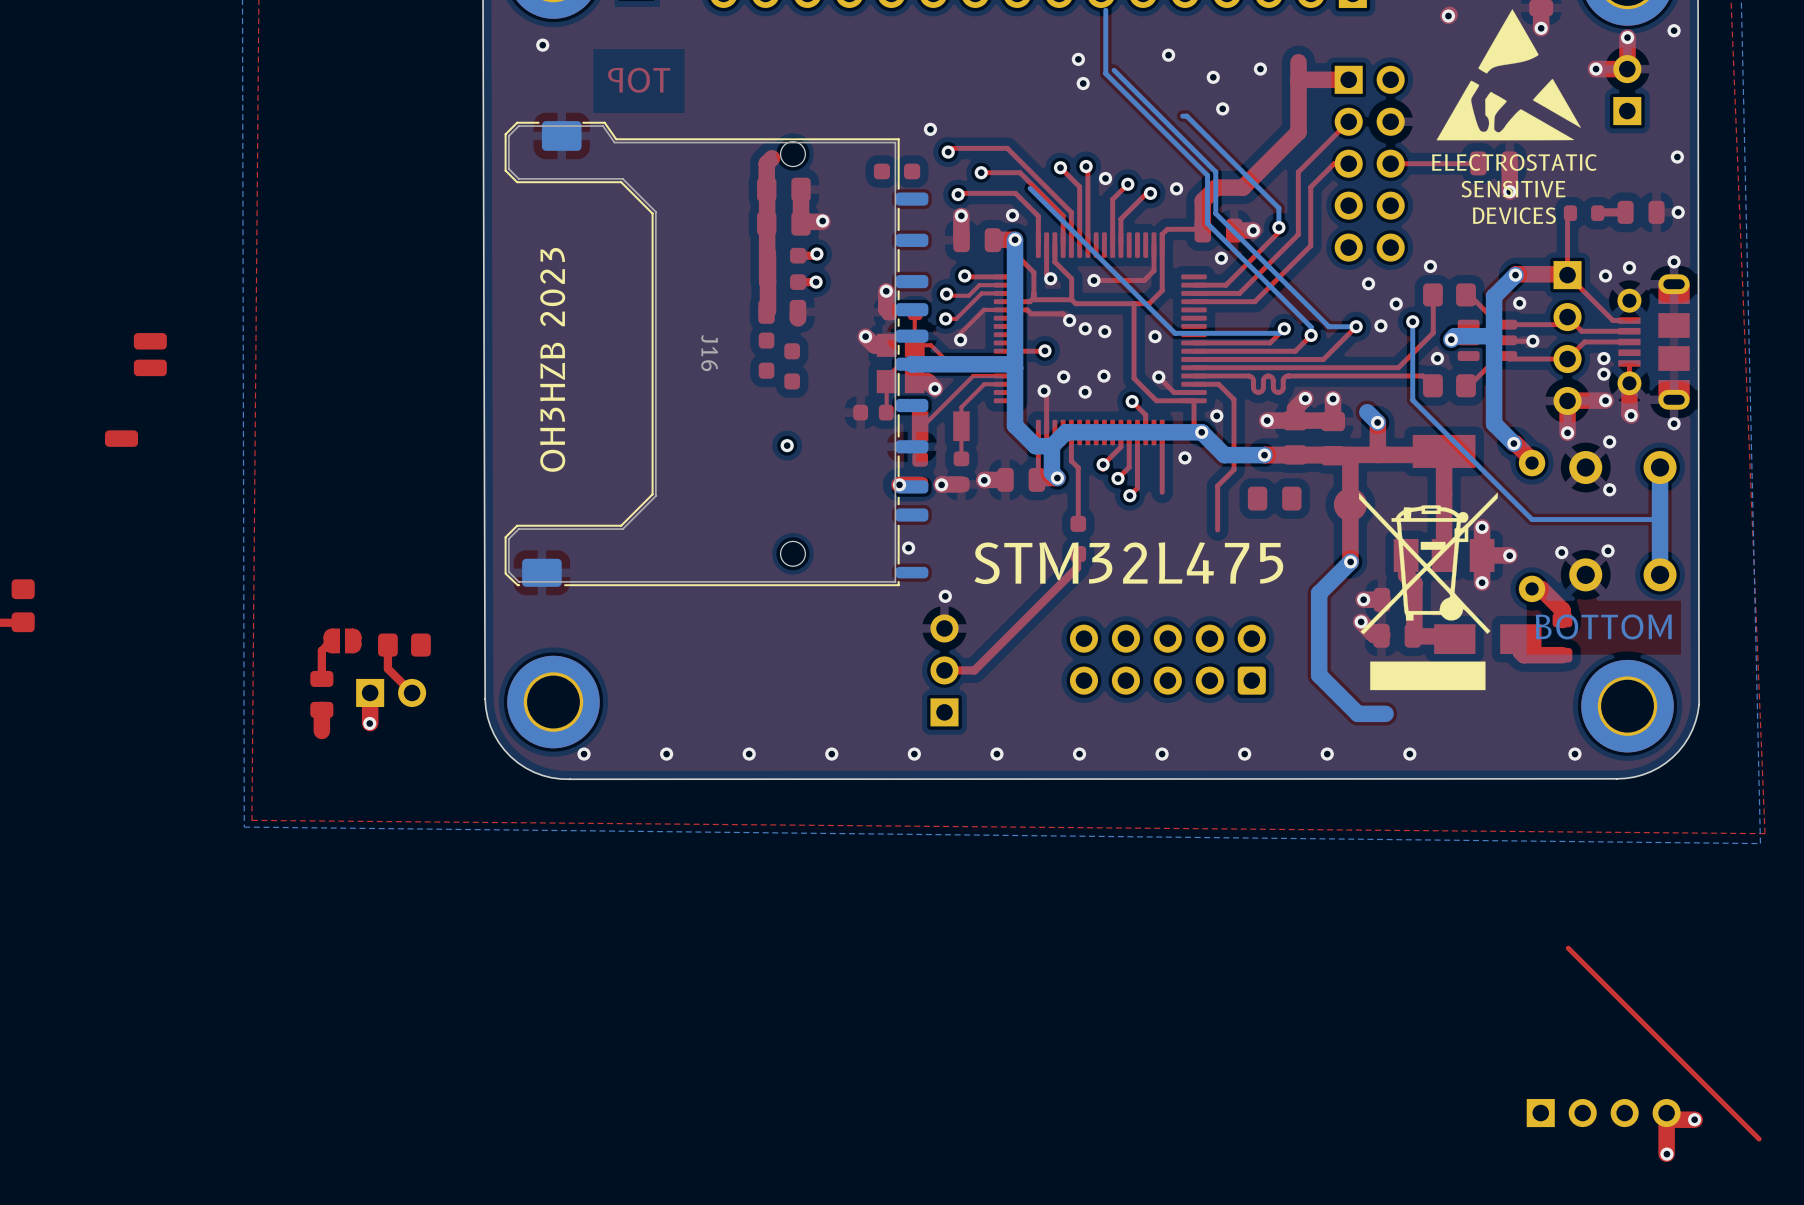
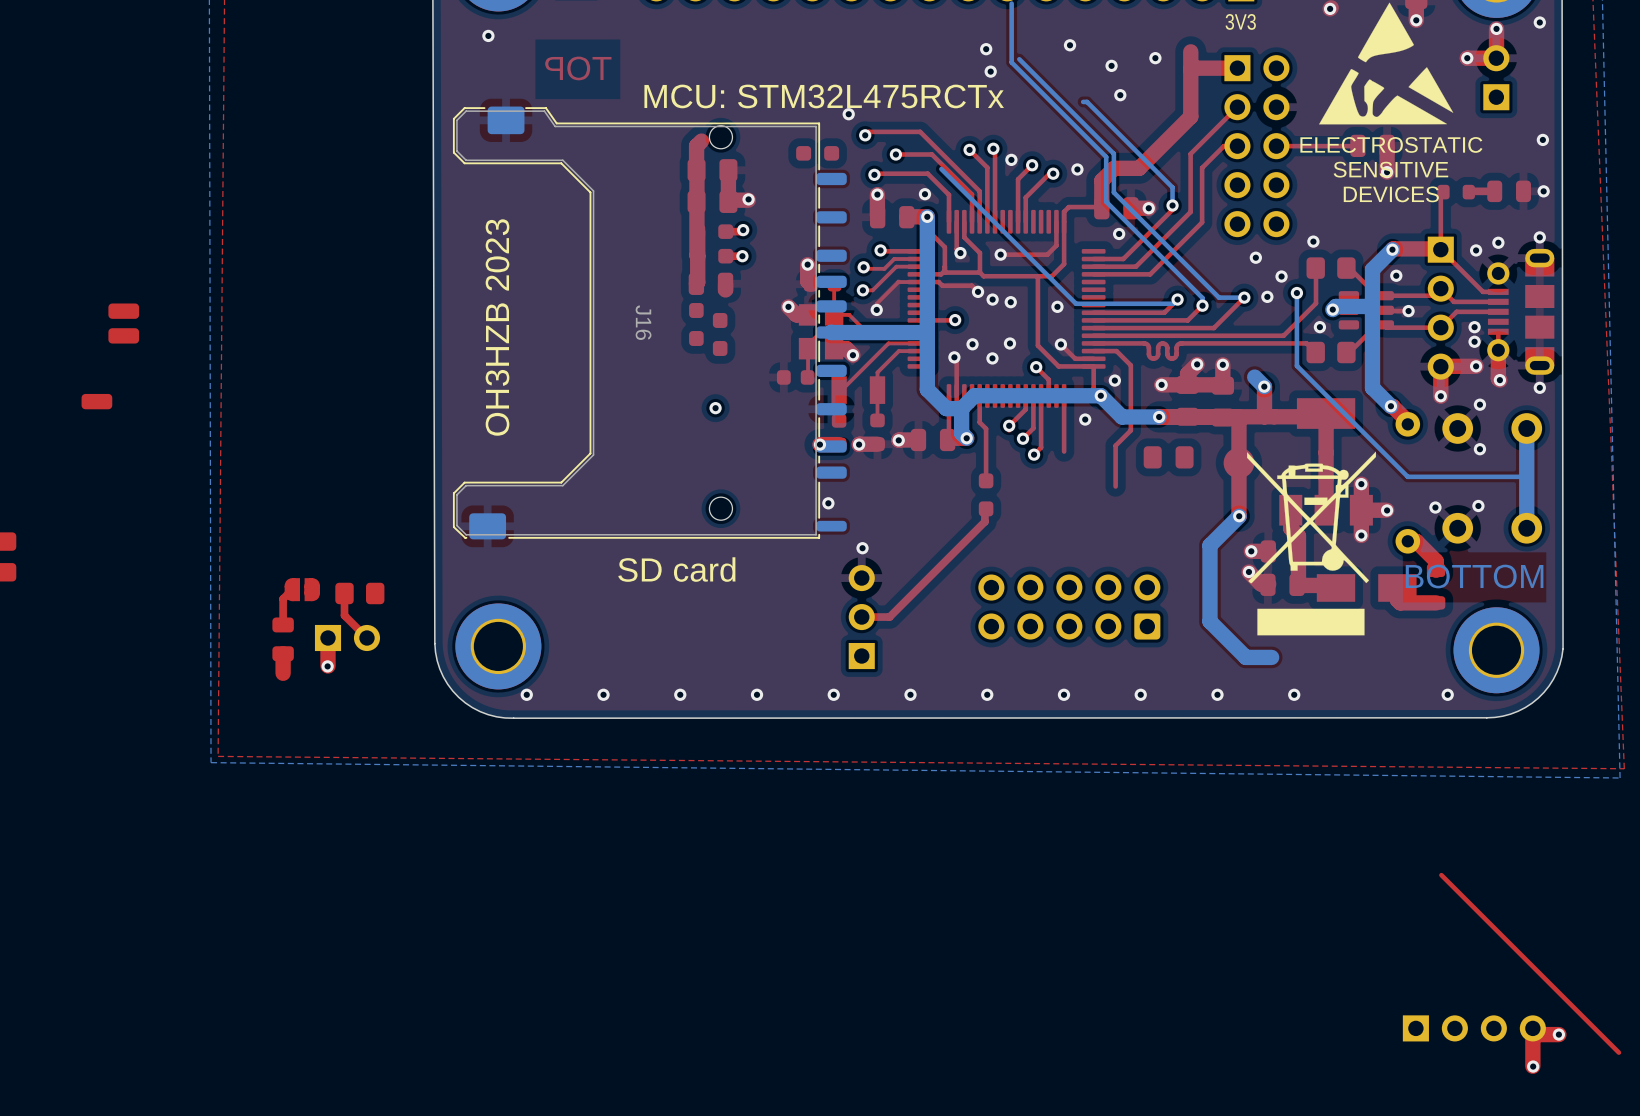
text: none -> 3V3 (1240, 21)
text: none -> MCU: STM32L475RCTx (824, 96)
text: STM32L475 (1128, 563) -> none
text: none -> SD card (676, 569)

